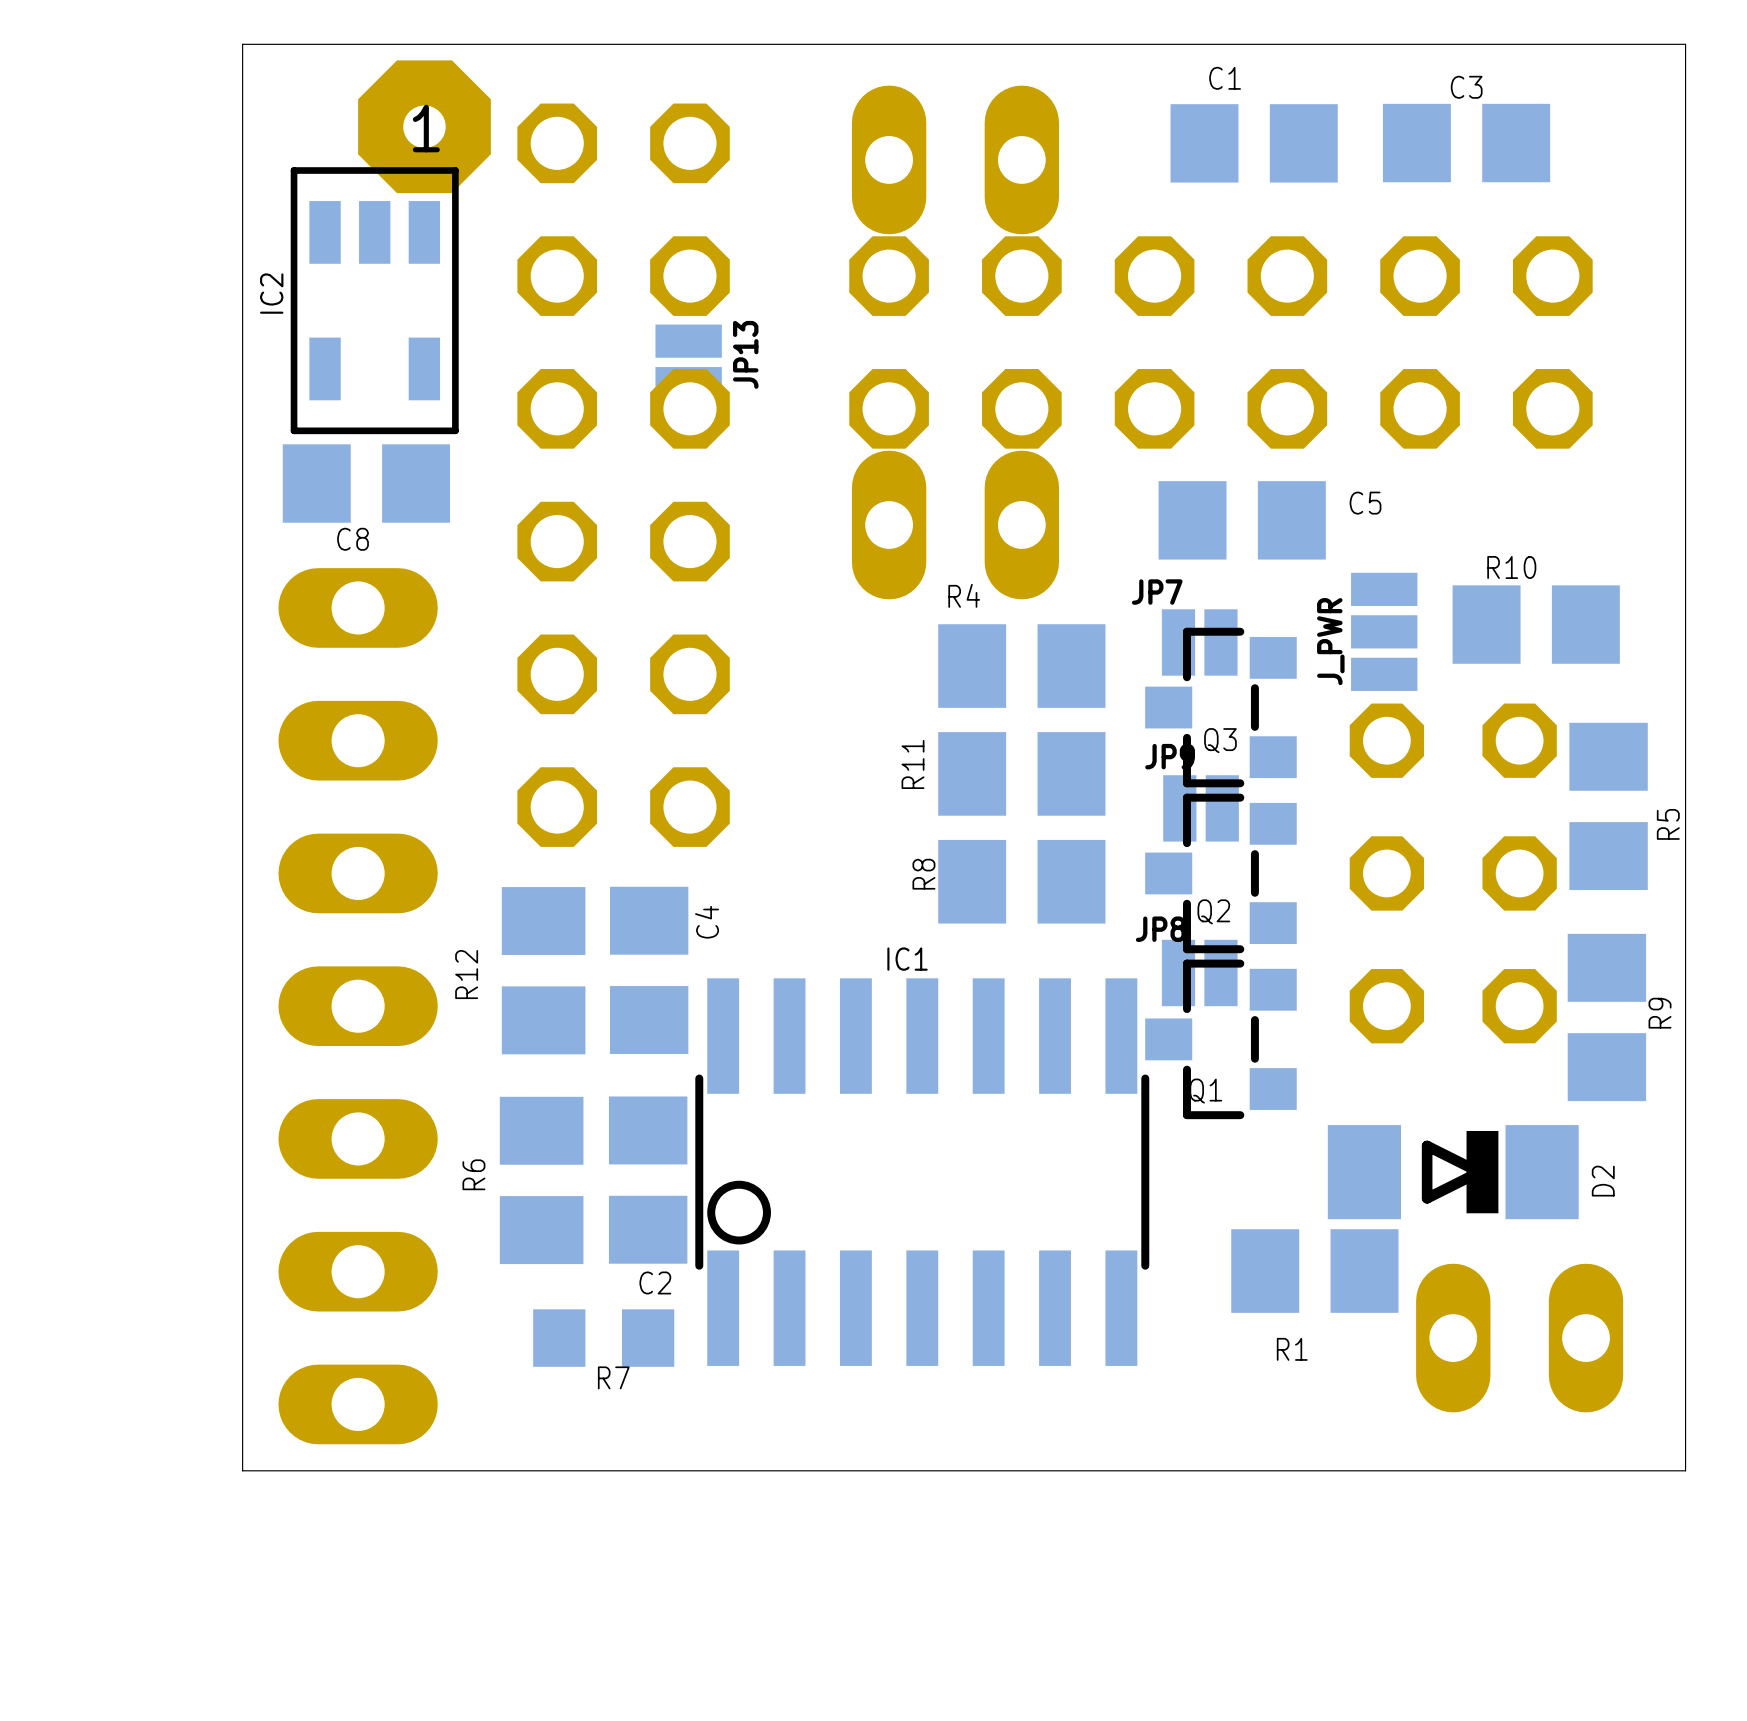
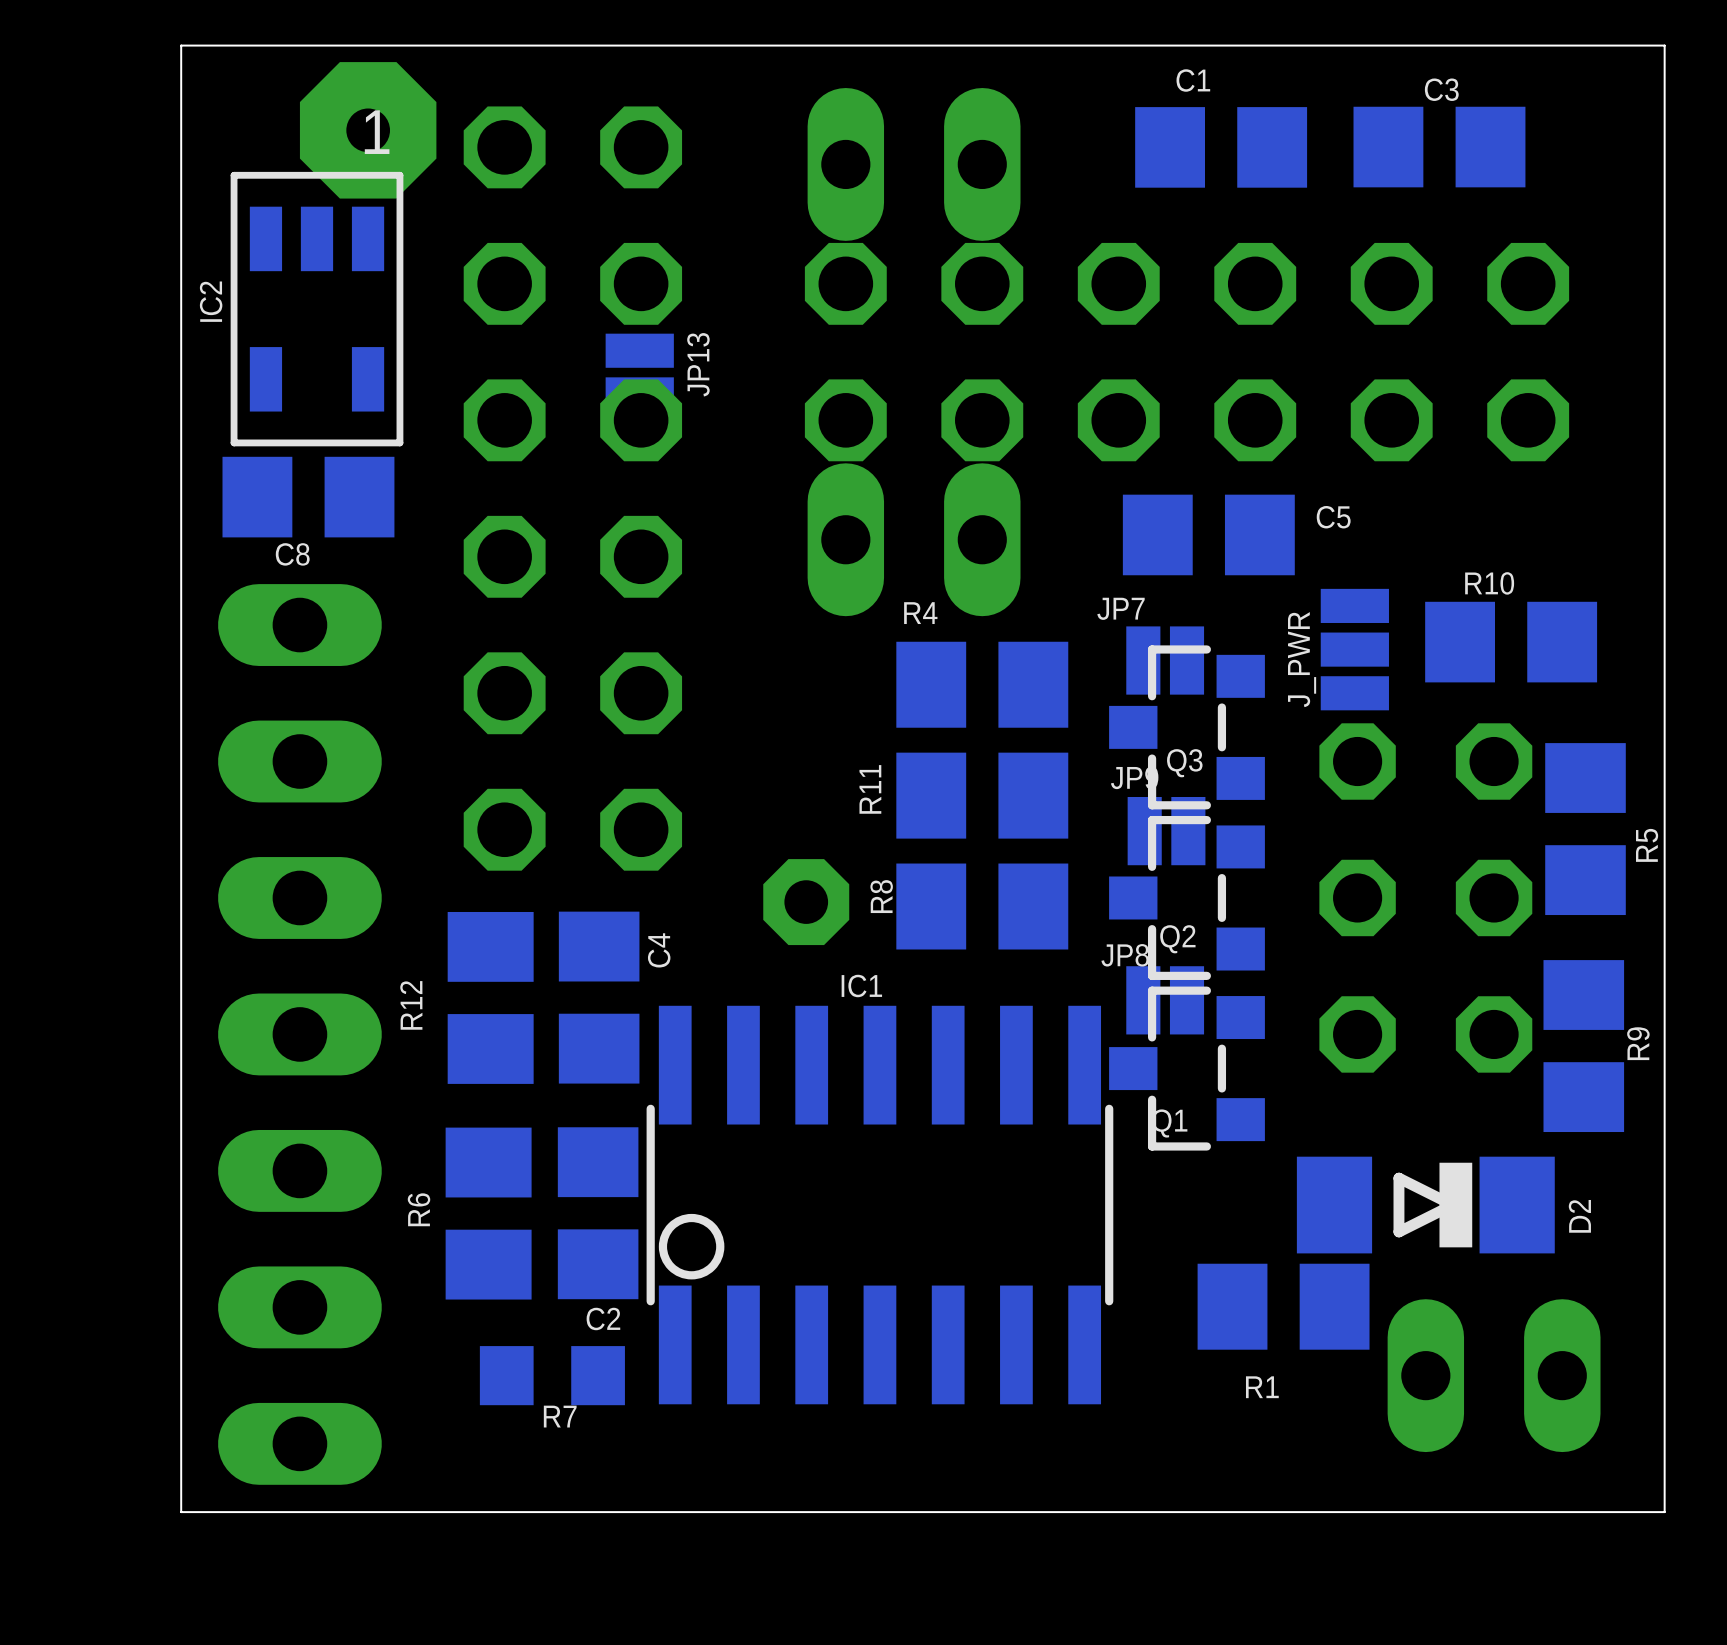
part: none -> (806, 902)

